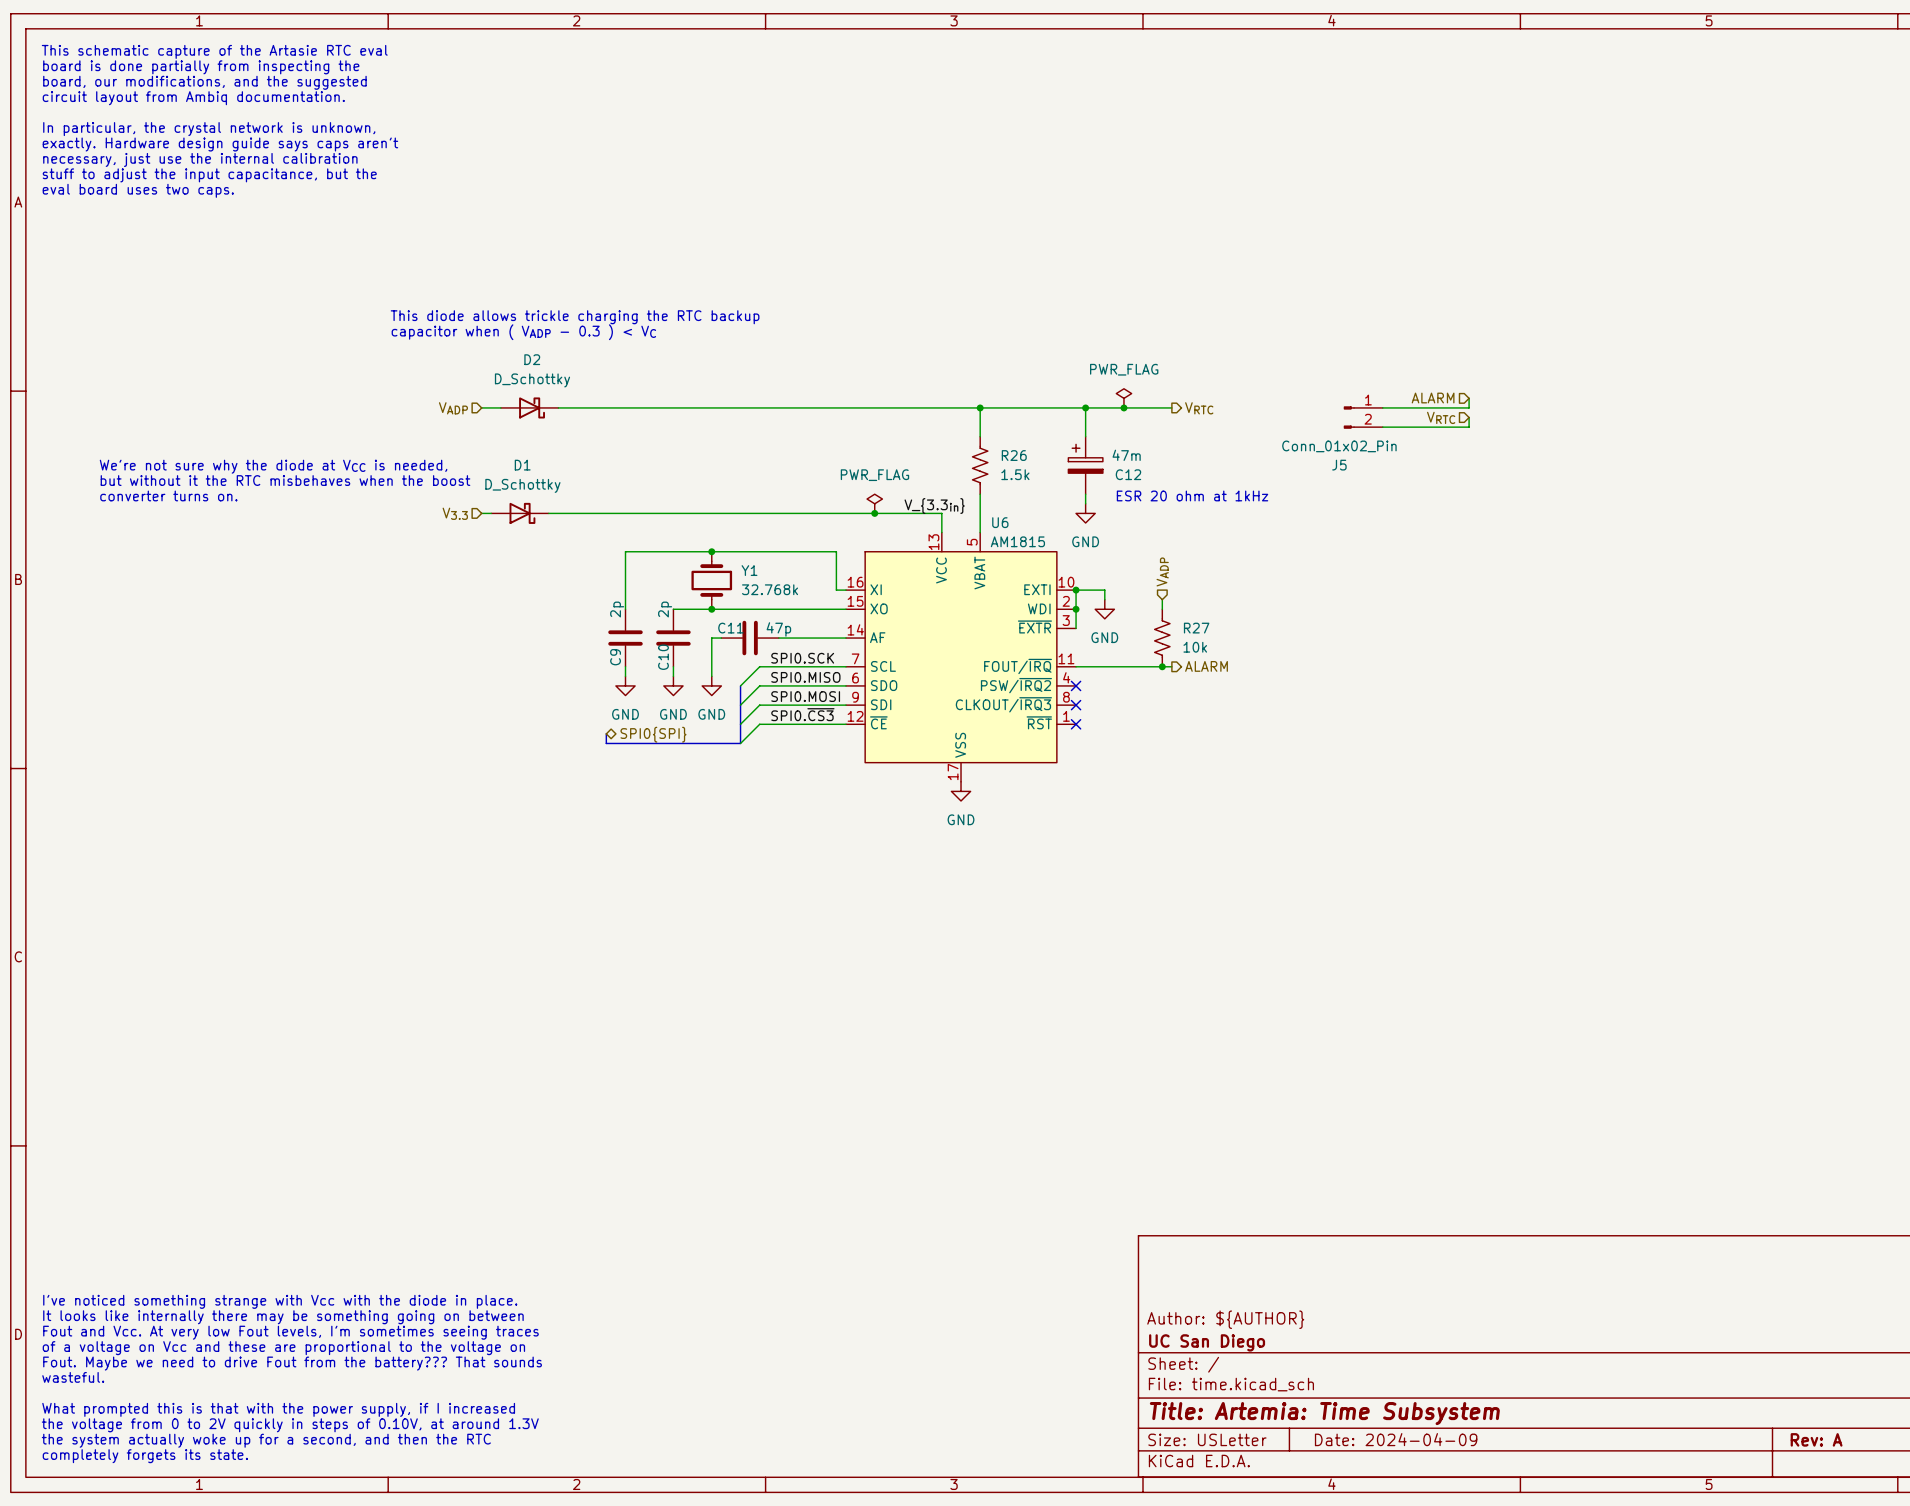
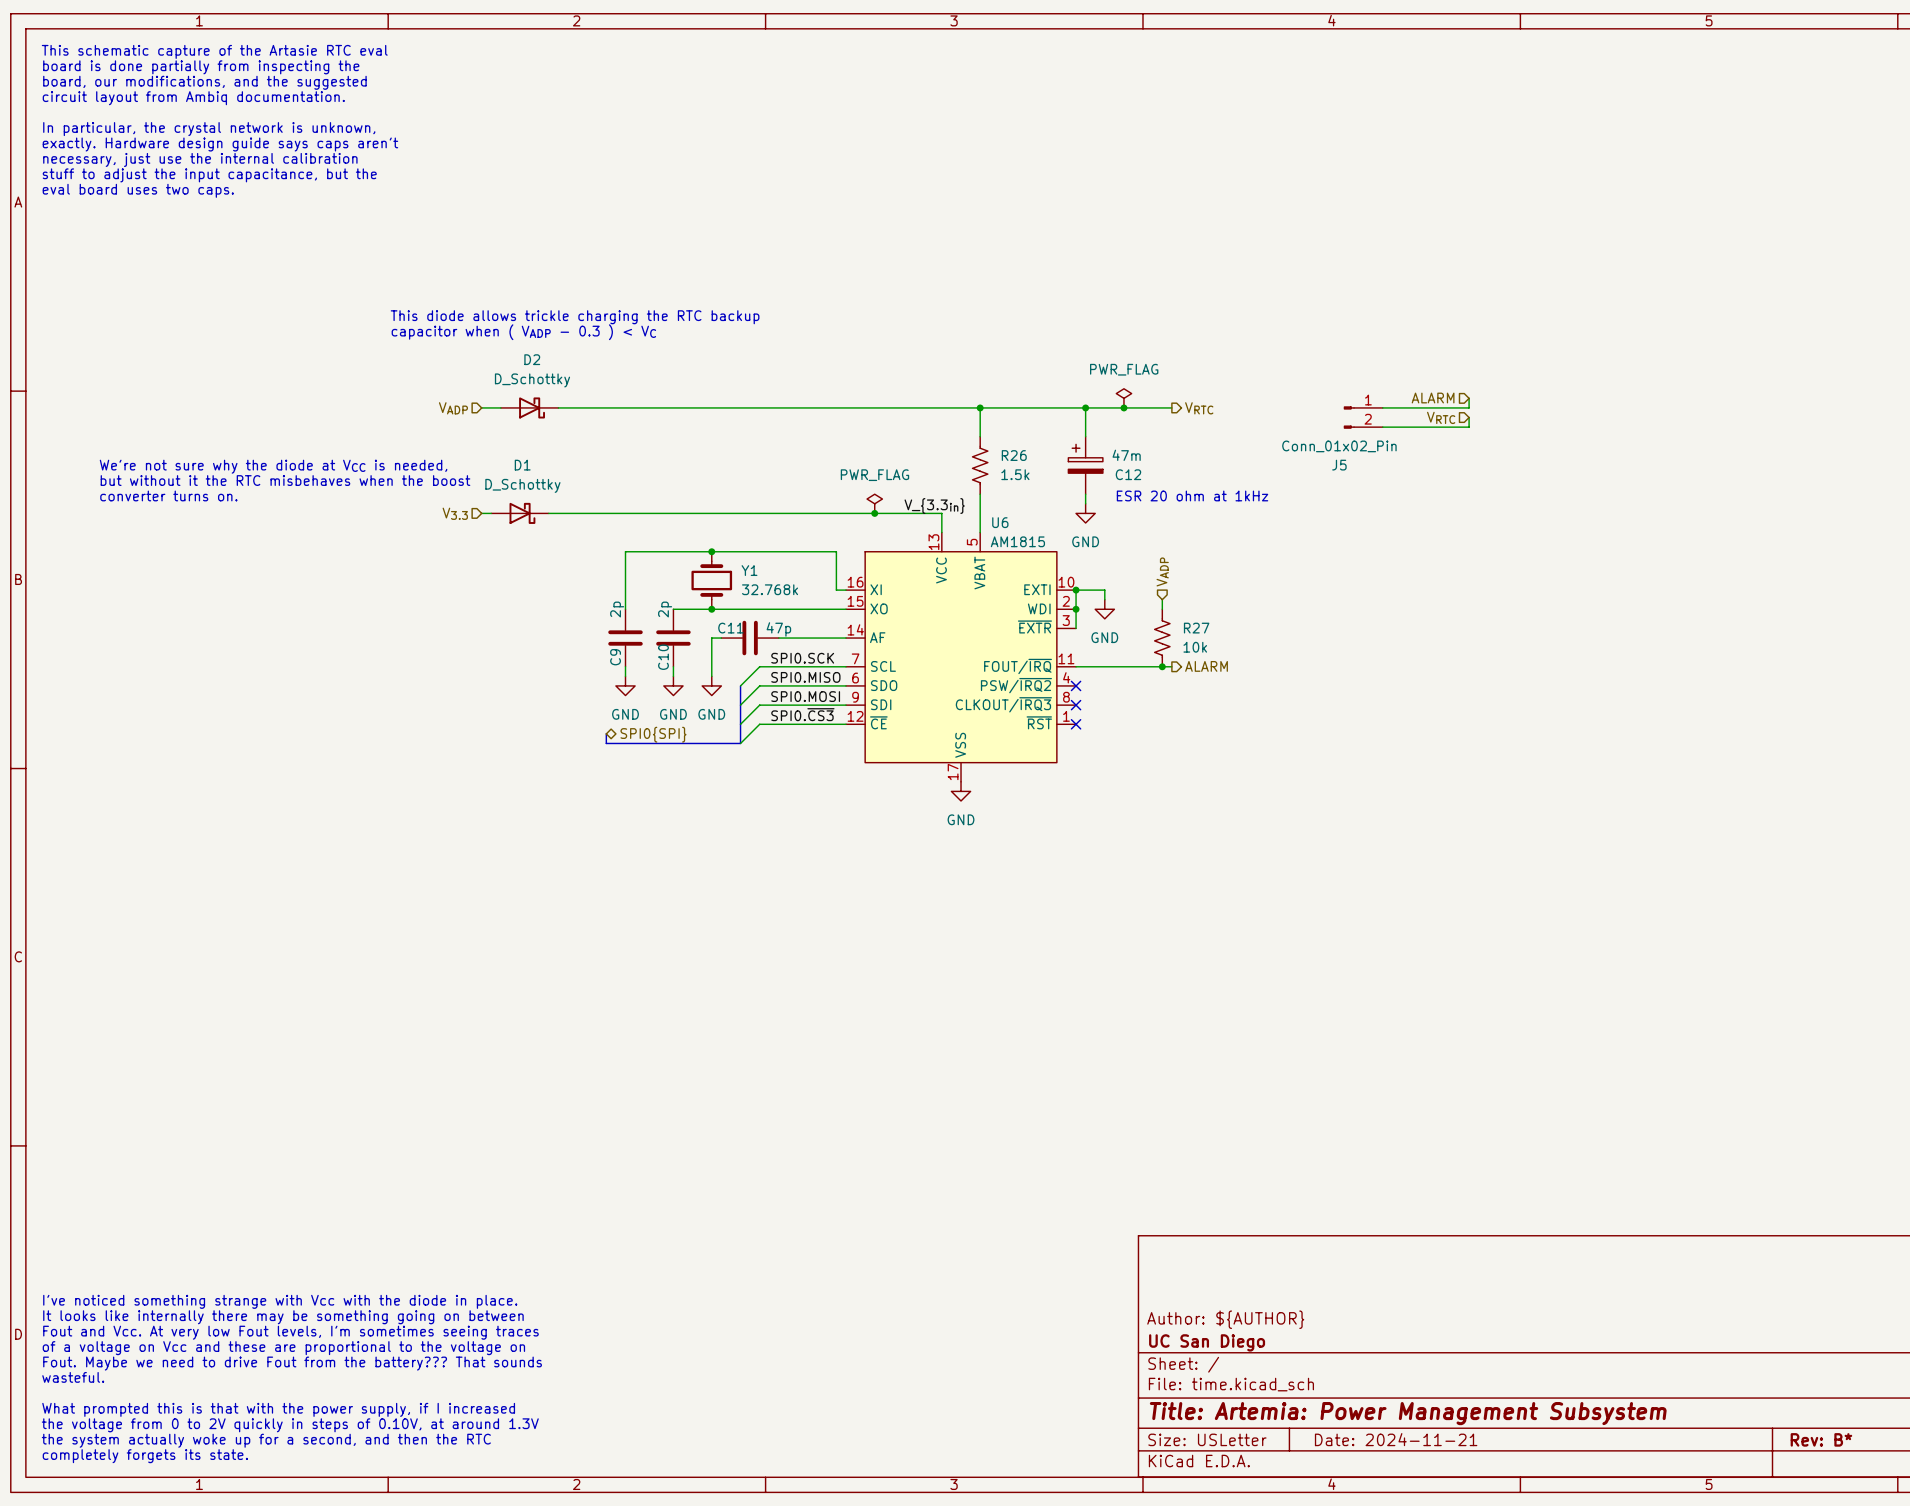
title block: Title: Artemia: Time Subsystem (1324, 1413) -> Title: Artemia: Power Management Subsystem (1408, 1413)
title block: Date: 2024-04-09 (1396, 1439) -> Date: 2024-11-21 (1396, 1439)
title block: Rev: A (1816, 1439) -> Rev: B* (1821, 1439)

